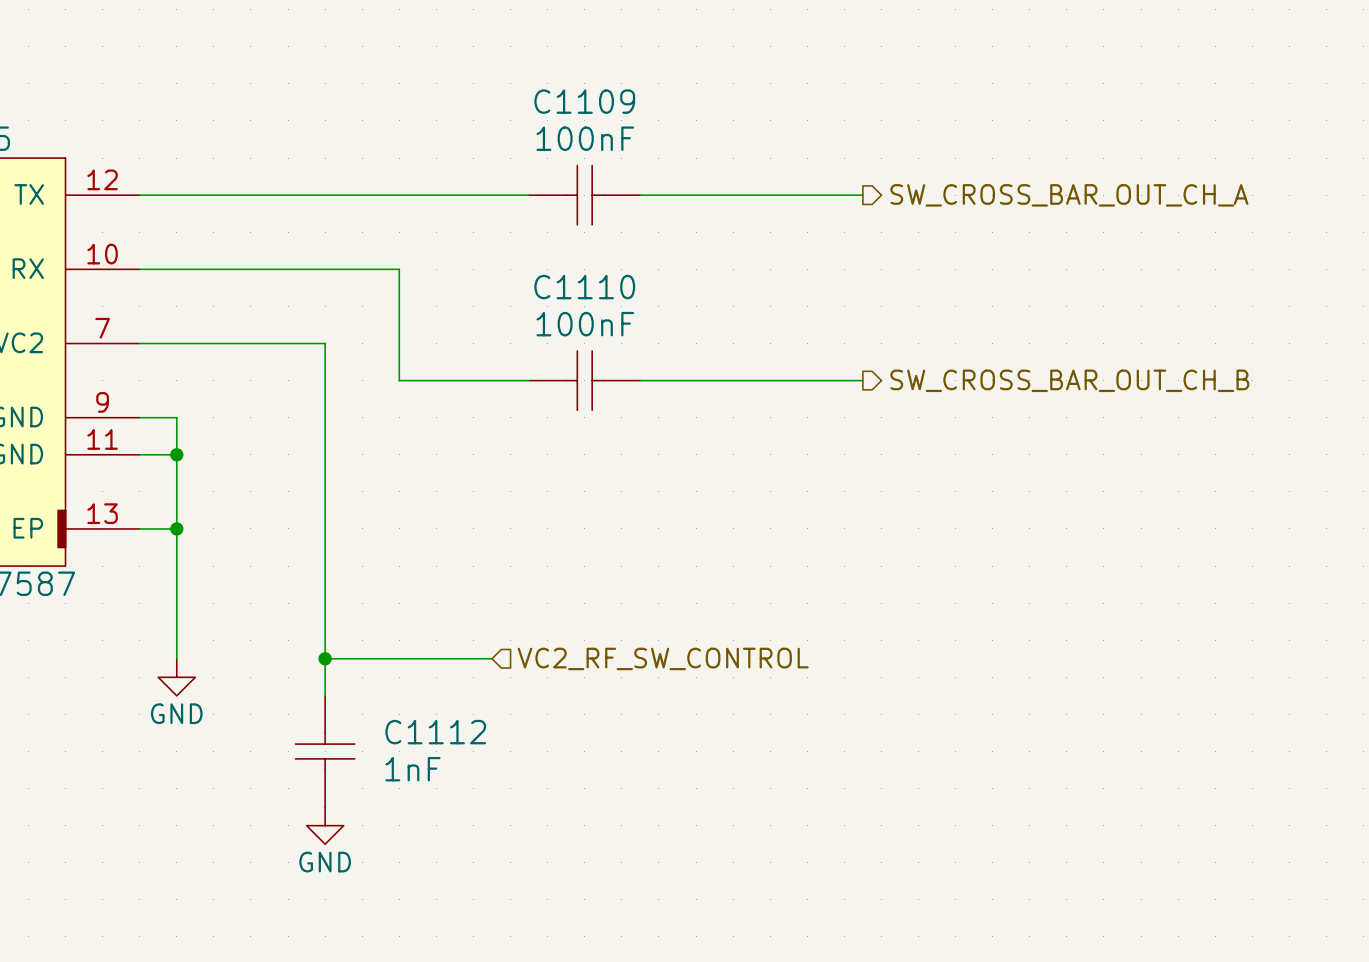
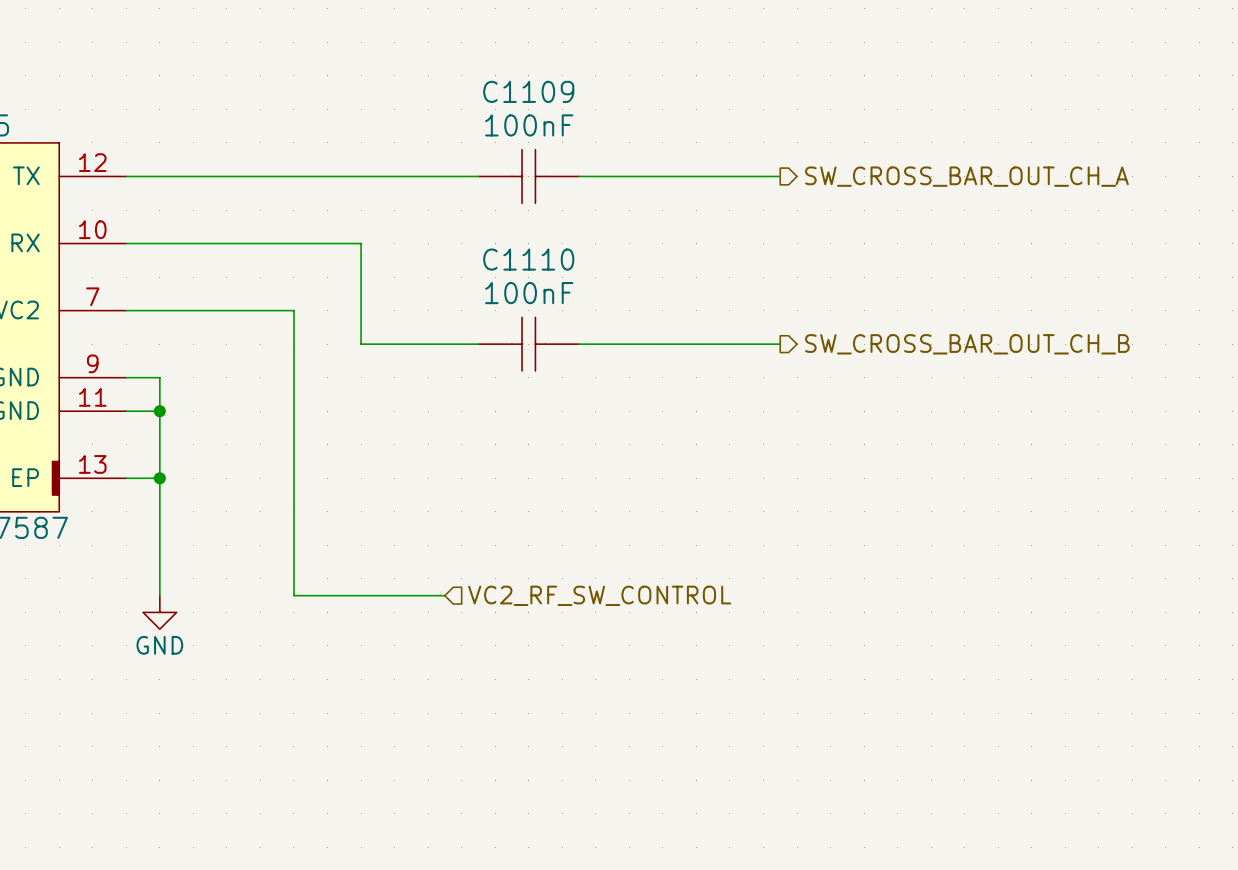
wire: (325, 658) (325, 695) -> none
junction: (325, 658) -> none
C1112: 1nF (325, 751) -> none
power symbol: GND (325, 825) -> none

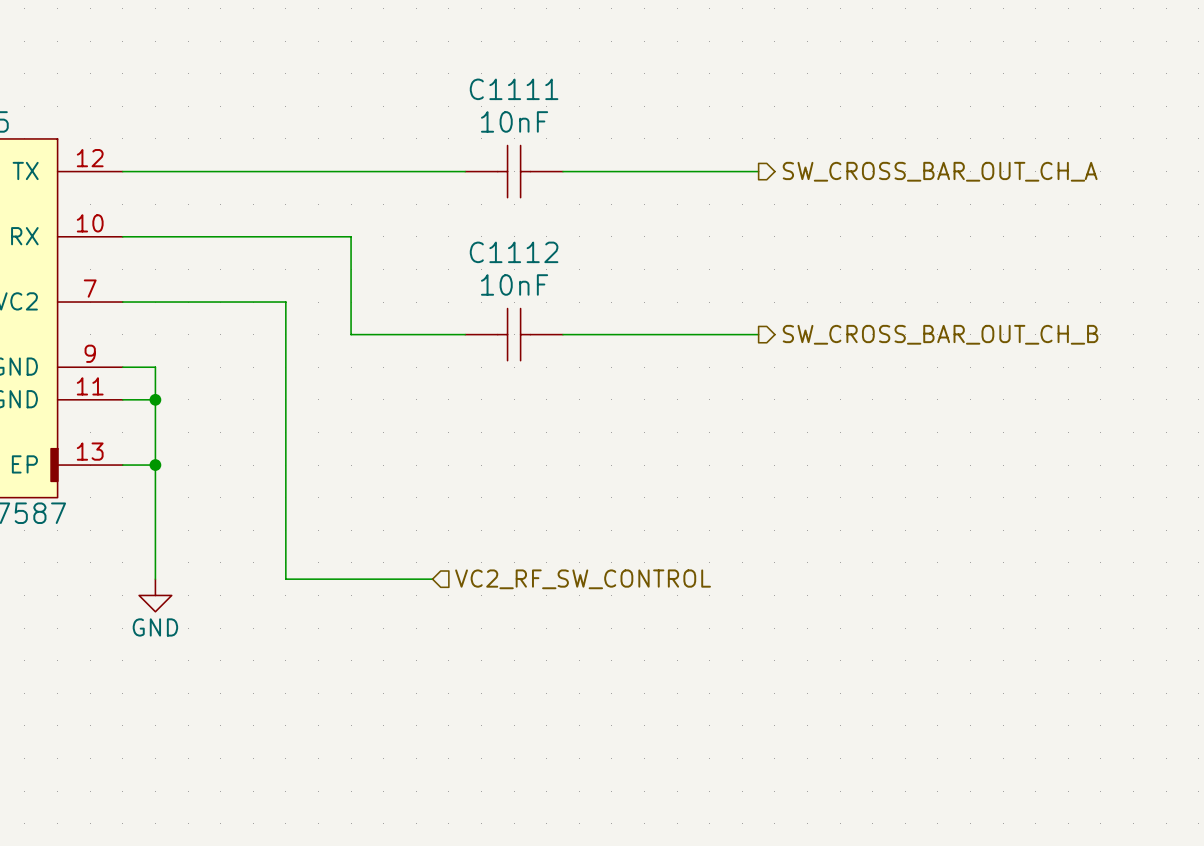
C1109 name: C1109 (528, 91) -> C1111 (514, 89)
C1109 value: 100nF (529, 125) -> 10nF (514, 121)
C1110 name: C1110 (528, 259) -> C1112 (514, 252)
C1110 value: 100nF (529, 293) -> 10nF (514, 284)

